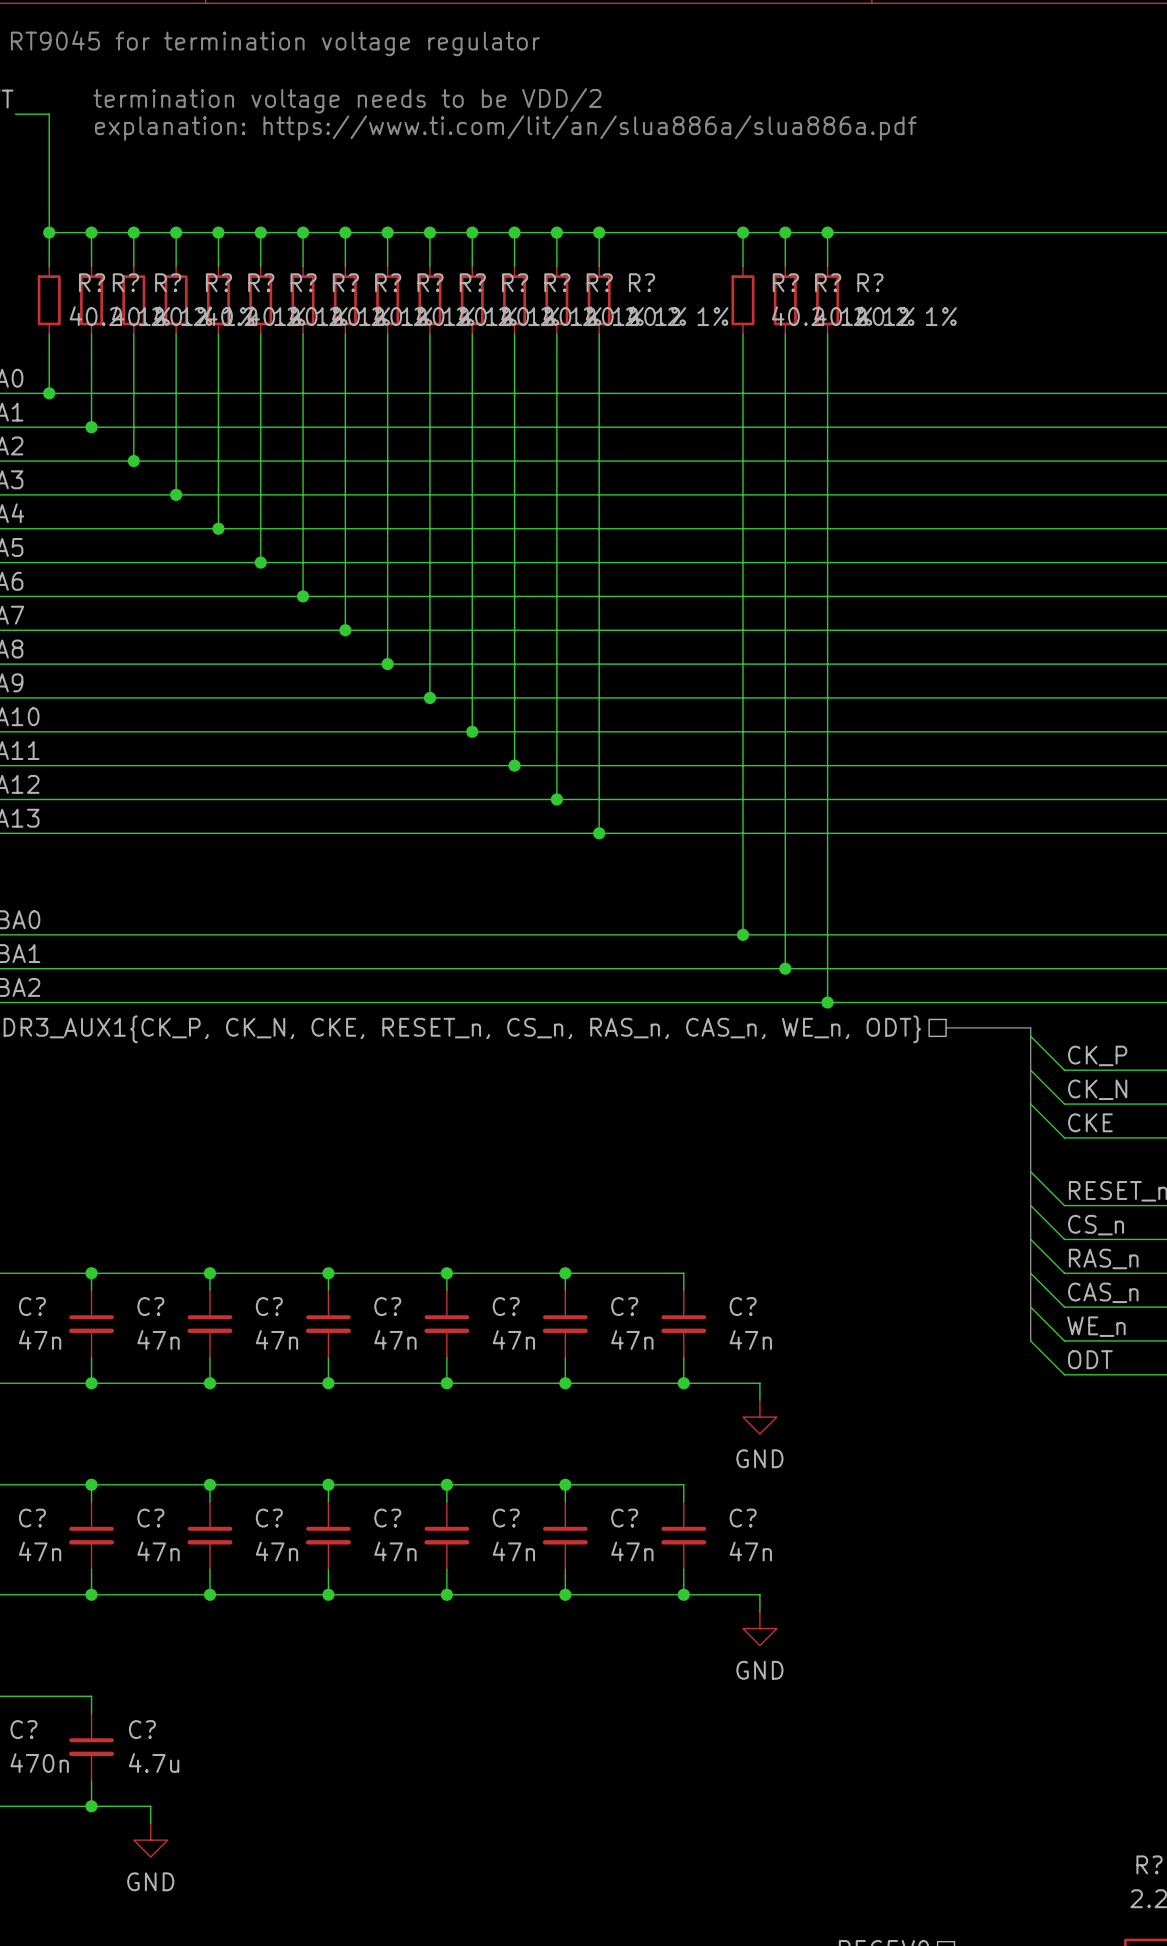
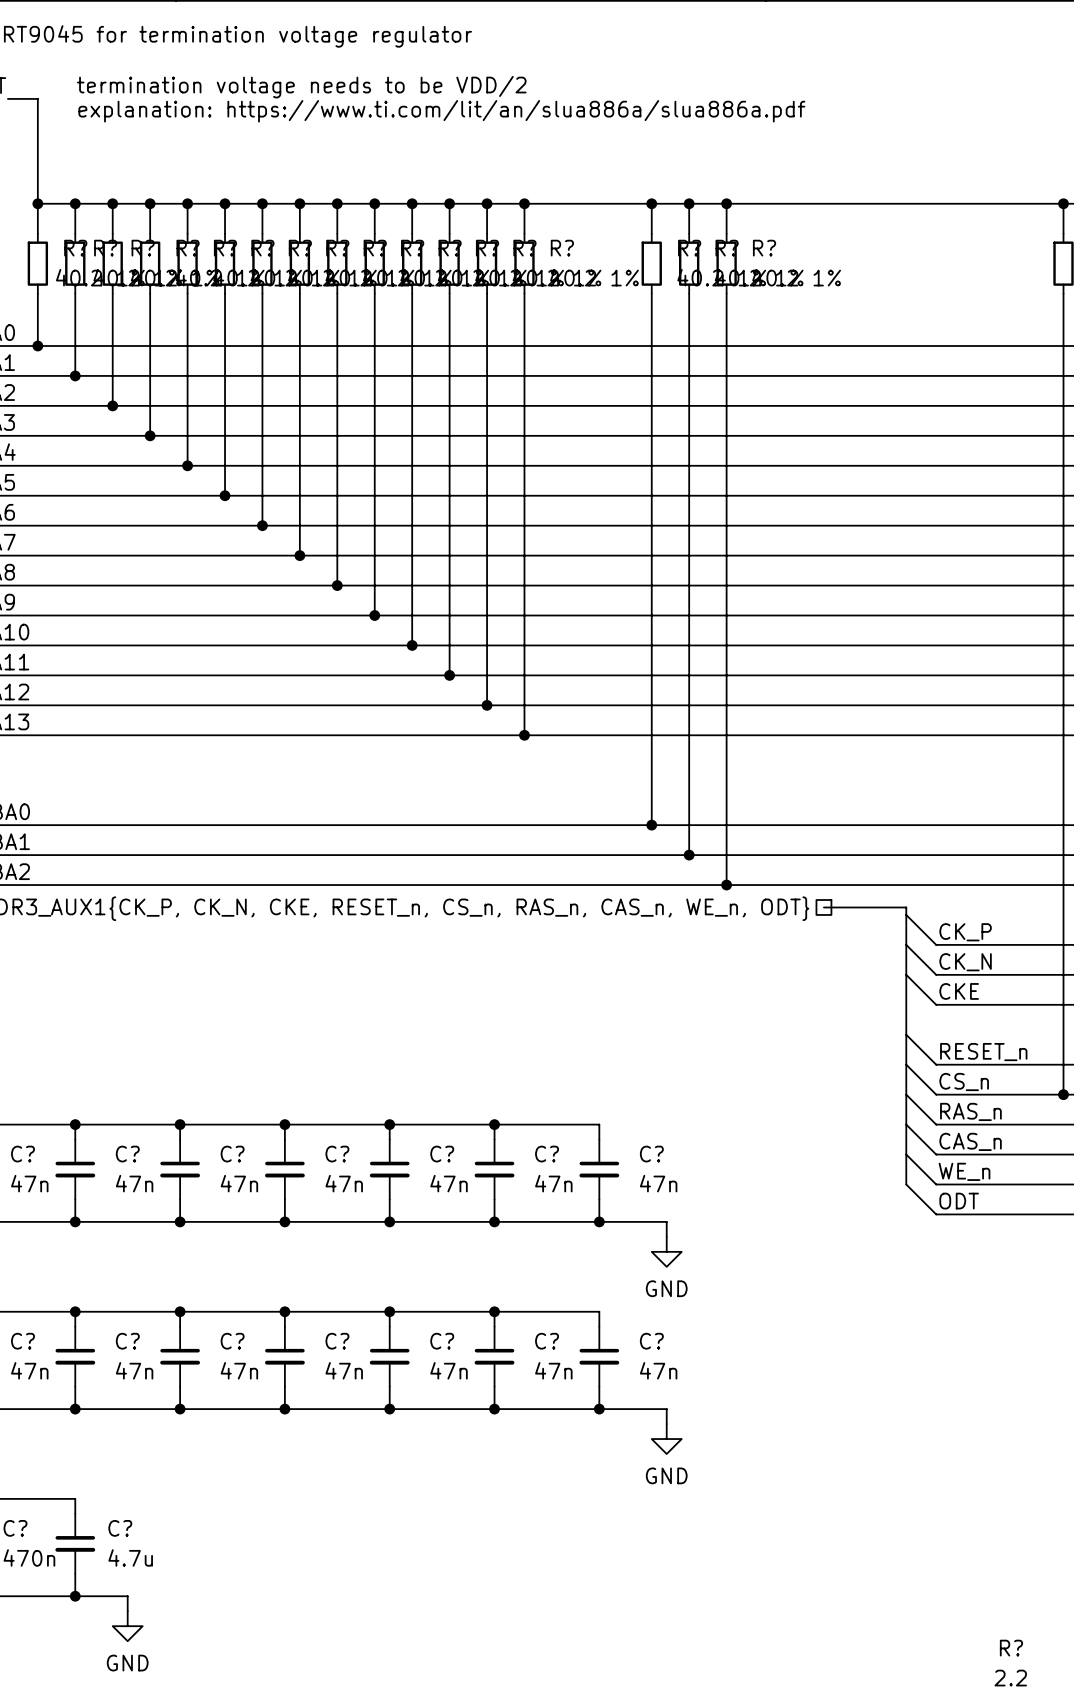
bus: none -> (823, 907) (831, 907)

